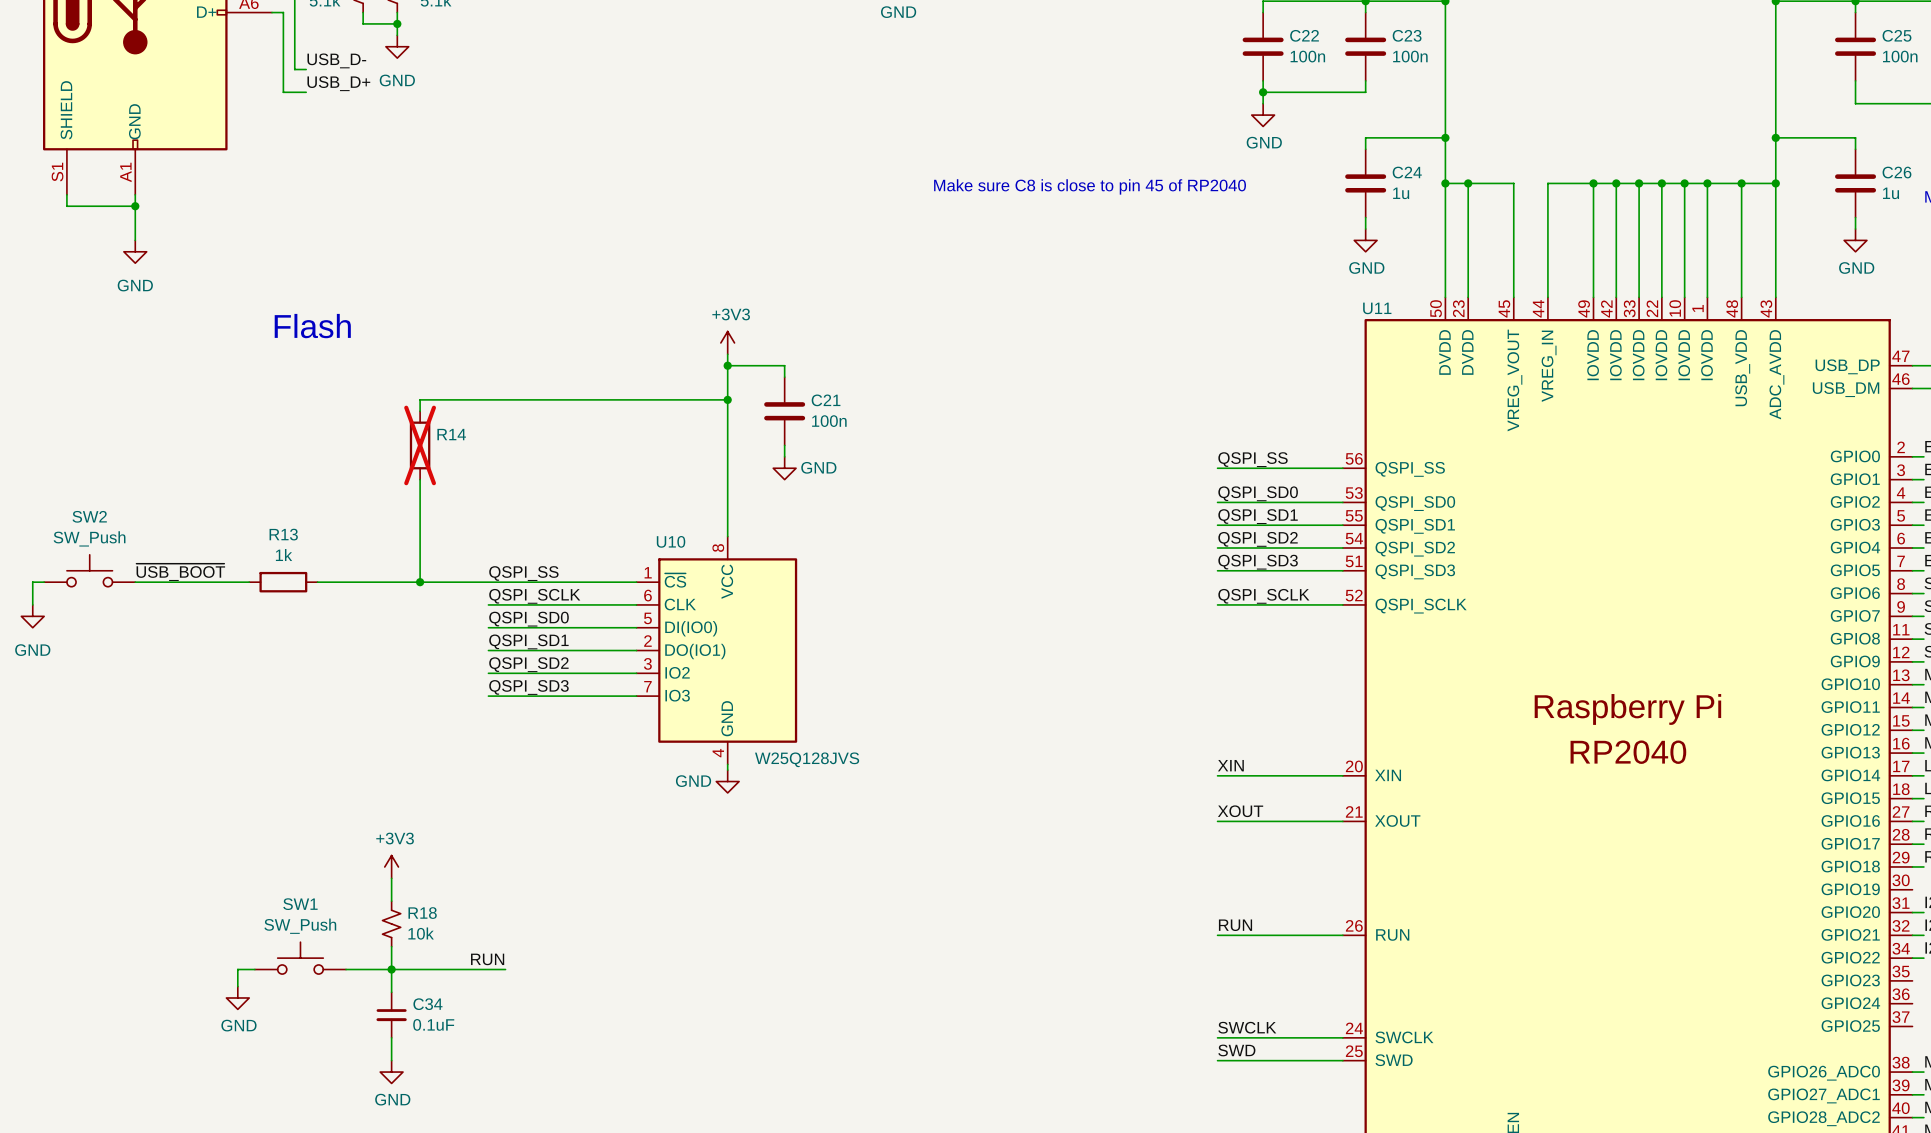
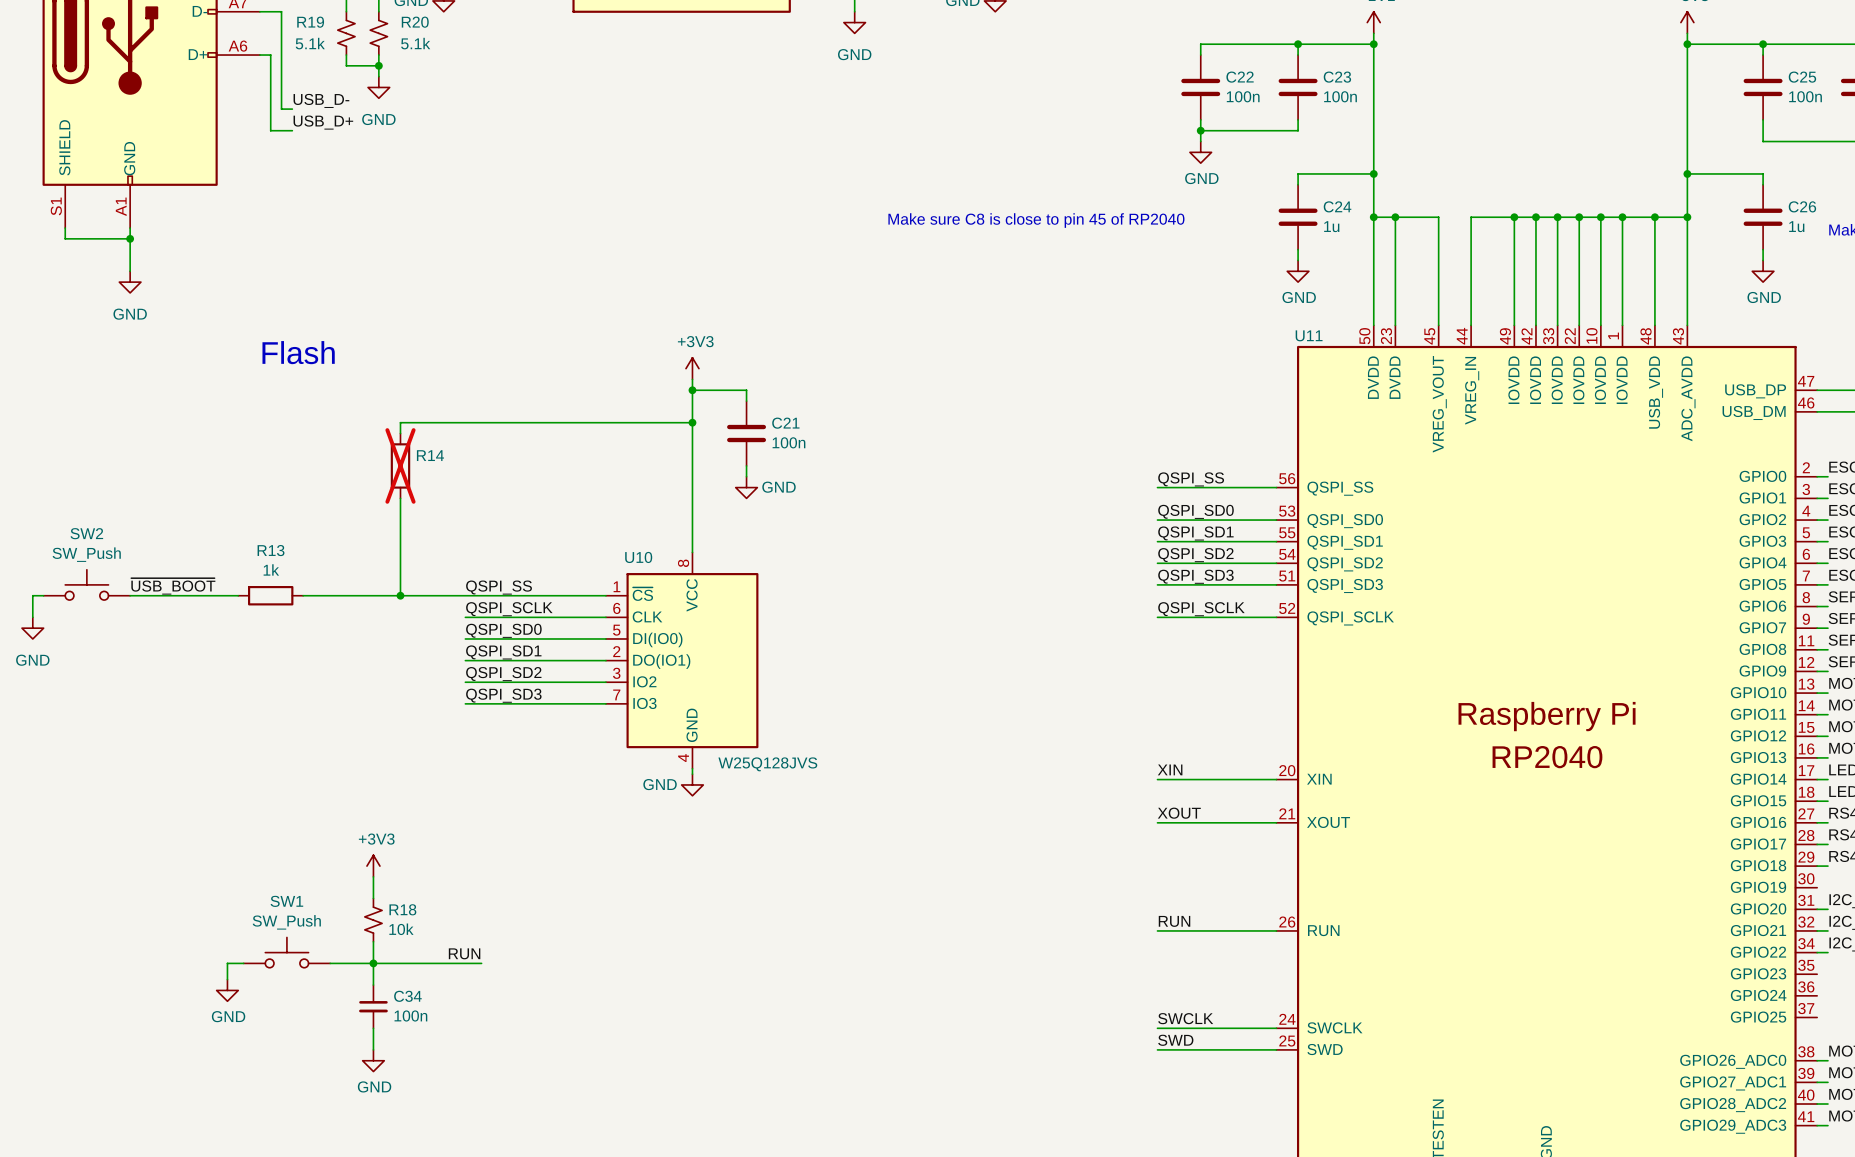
C34 value: 0.1uF (433, 1024) -> 100n (410, 1015)

